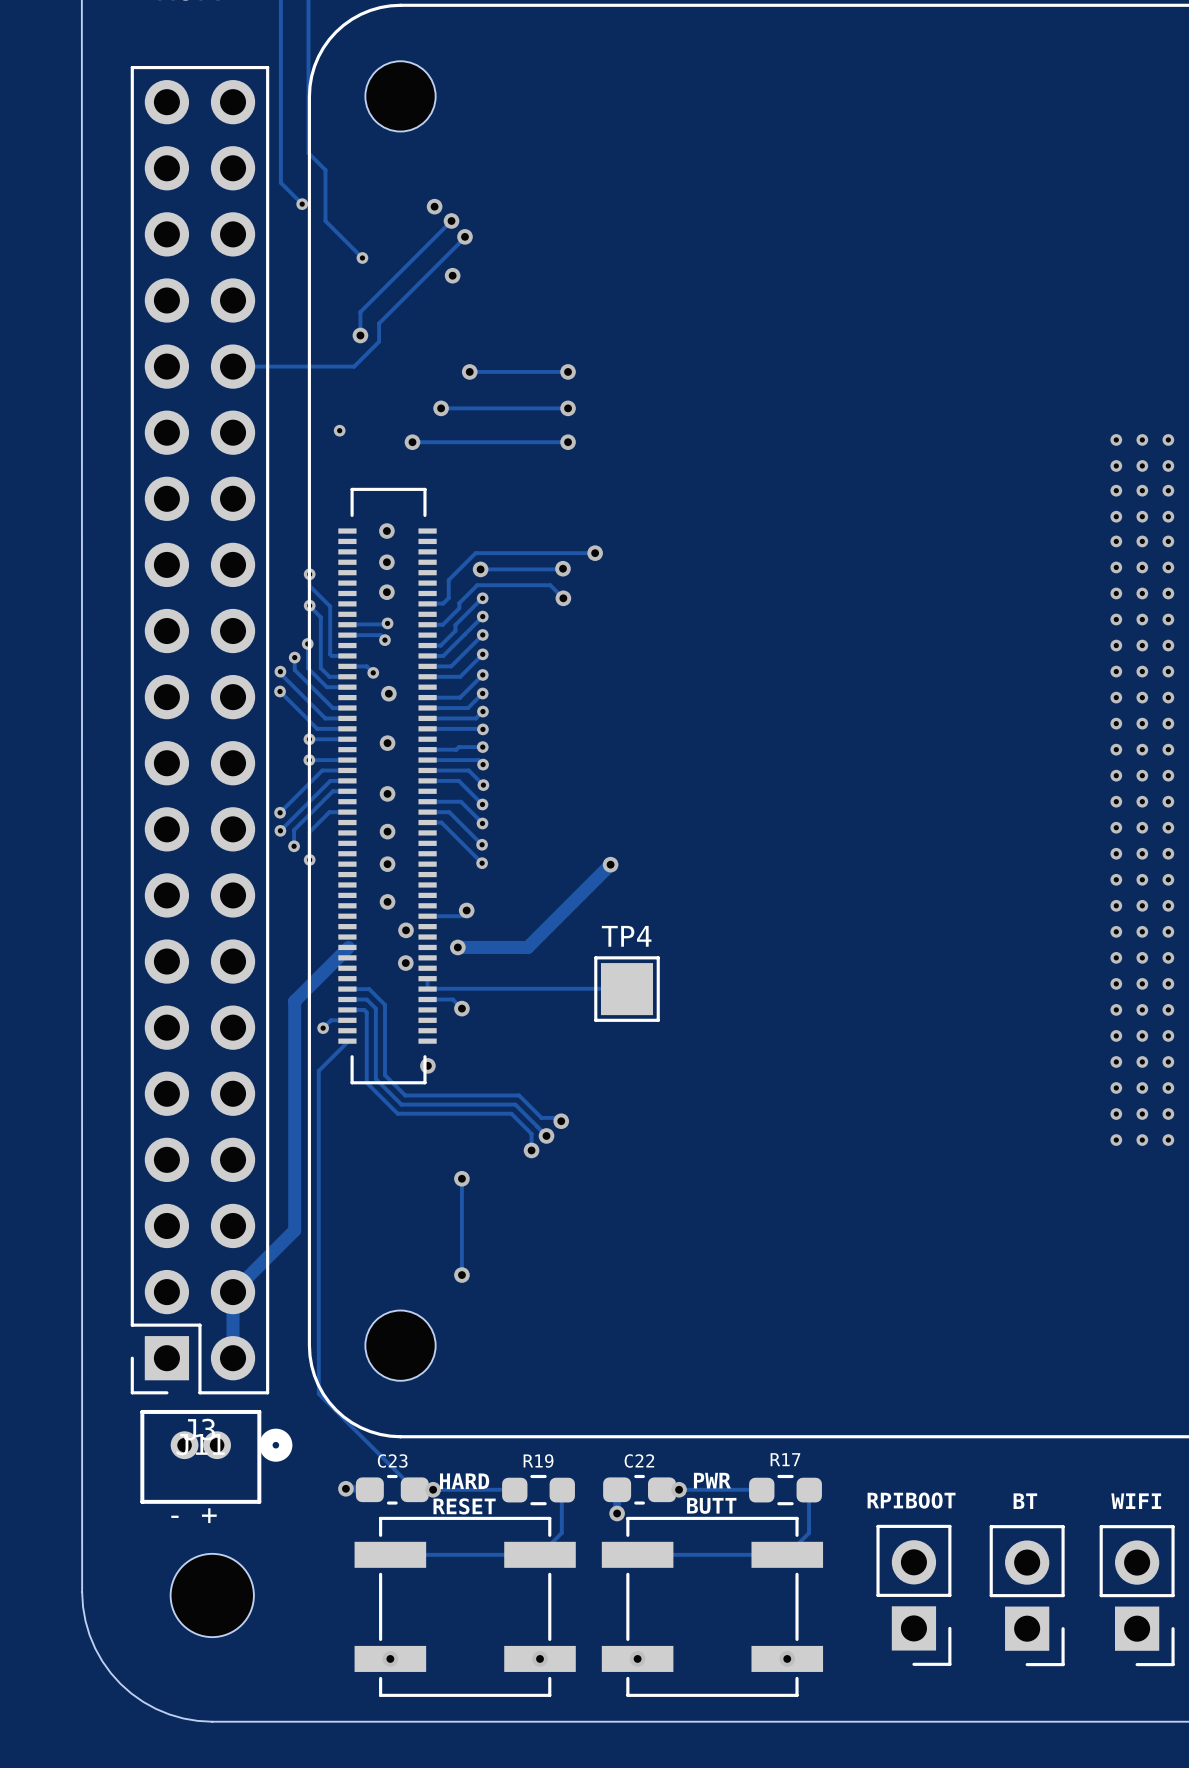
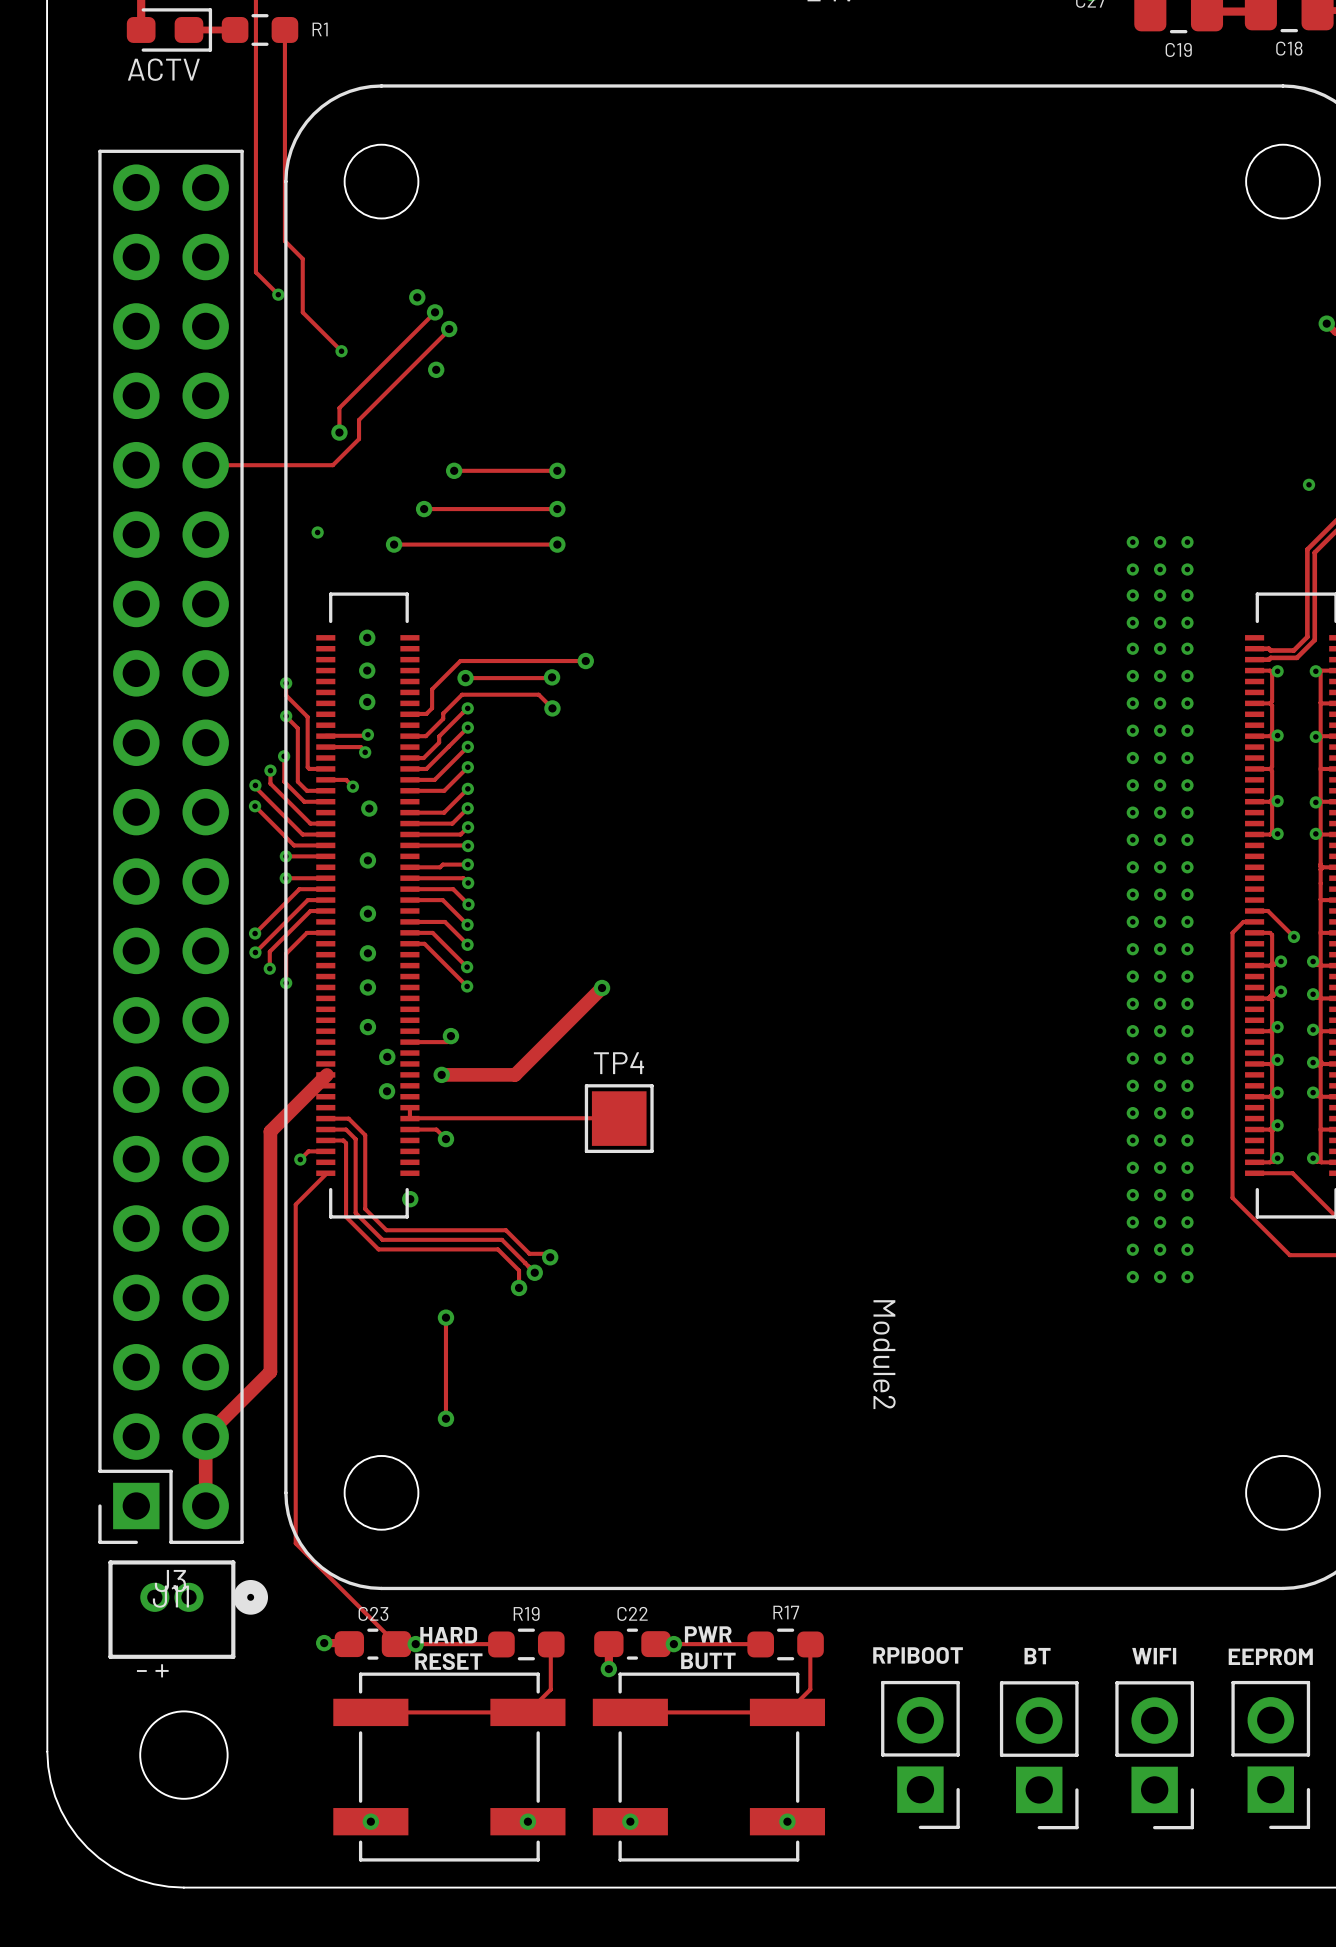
Module2 name: none -> Module2 (884, 1354)

